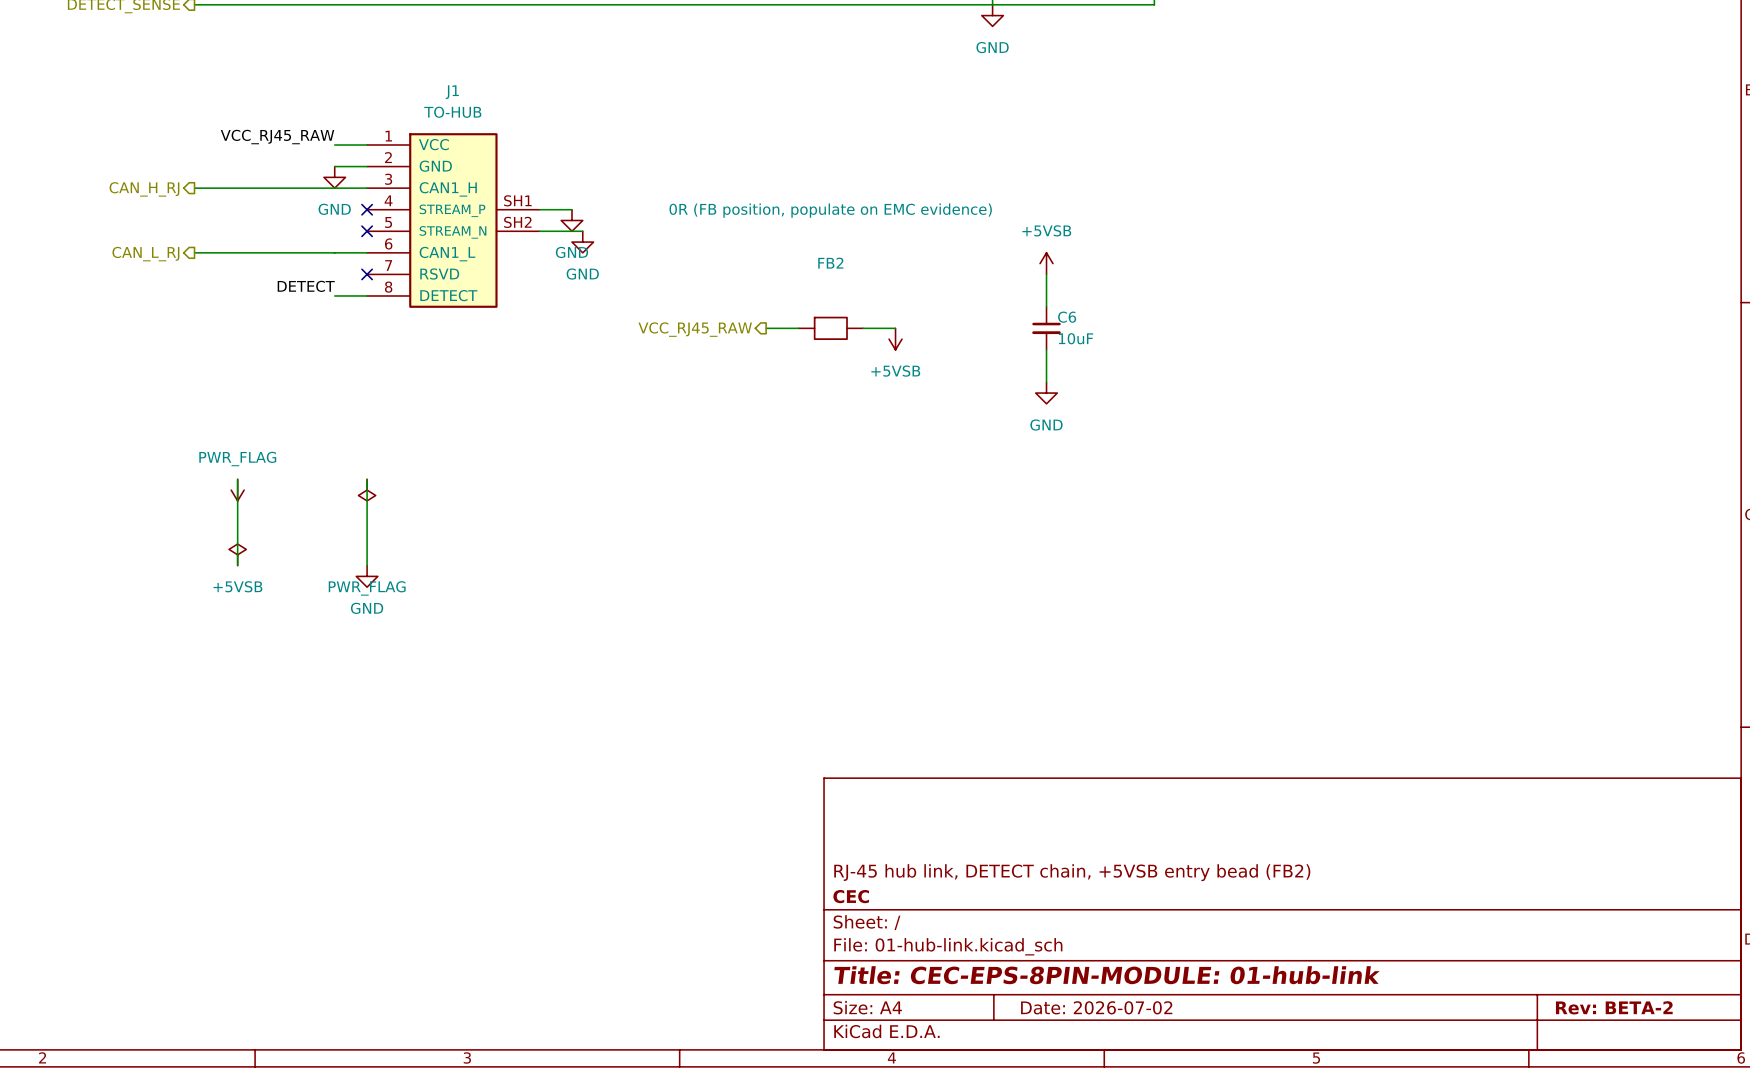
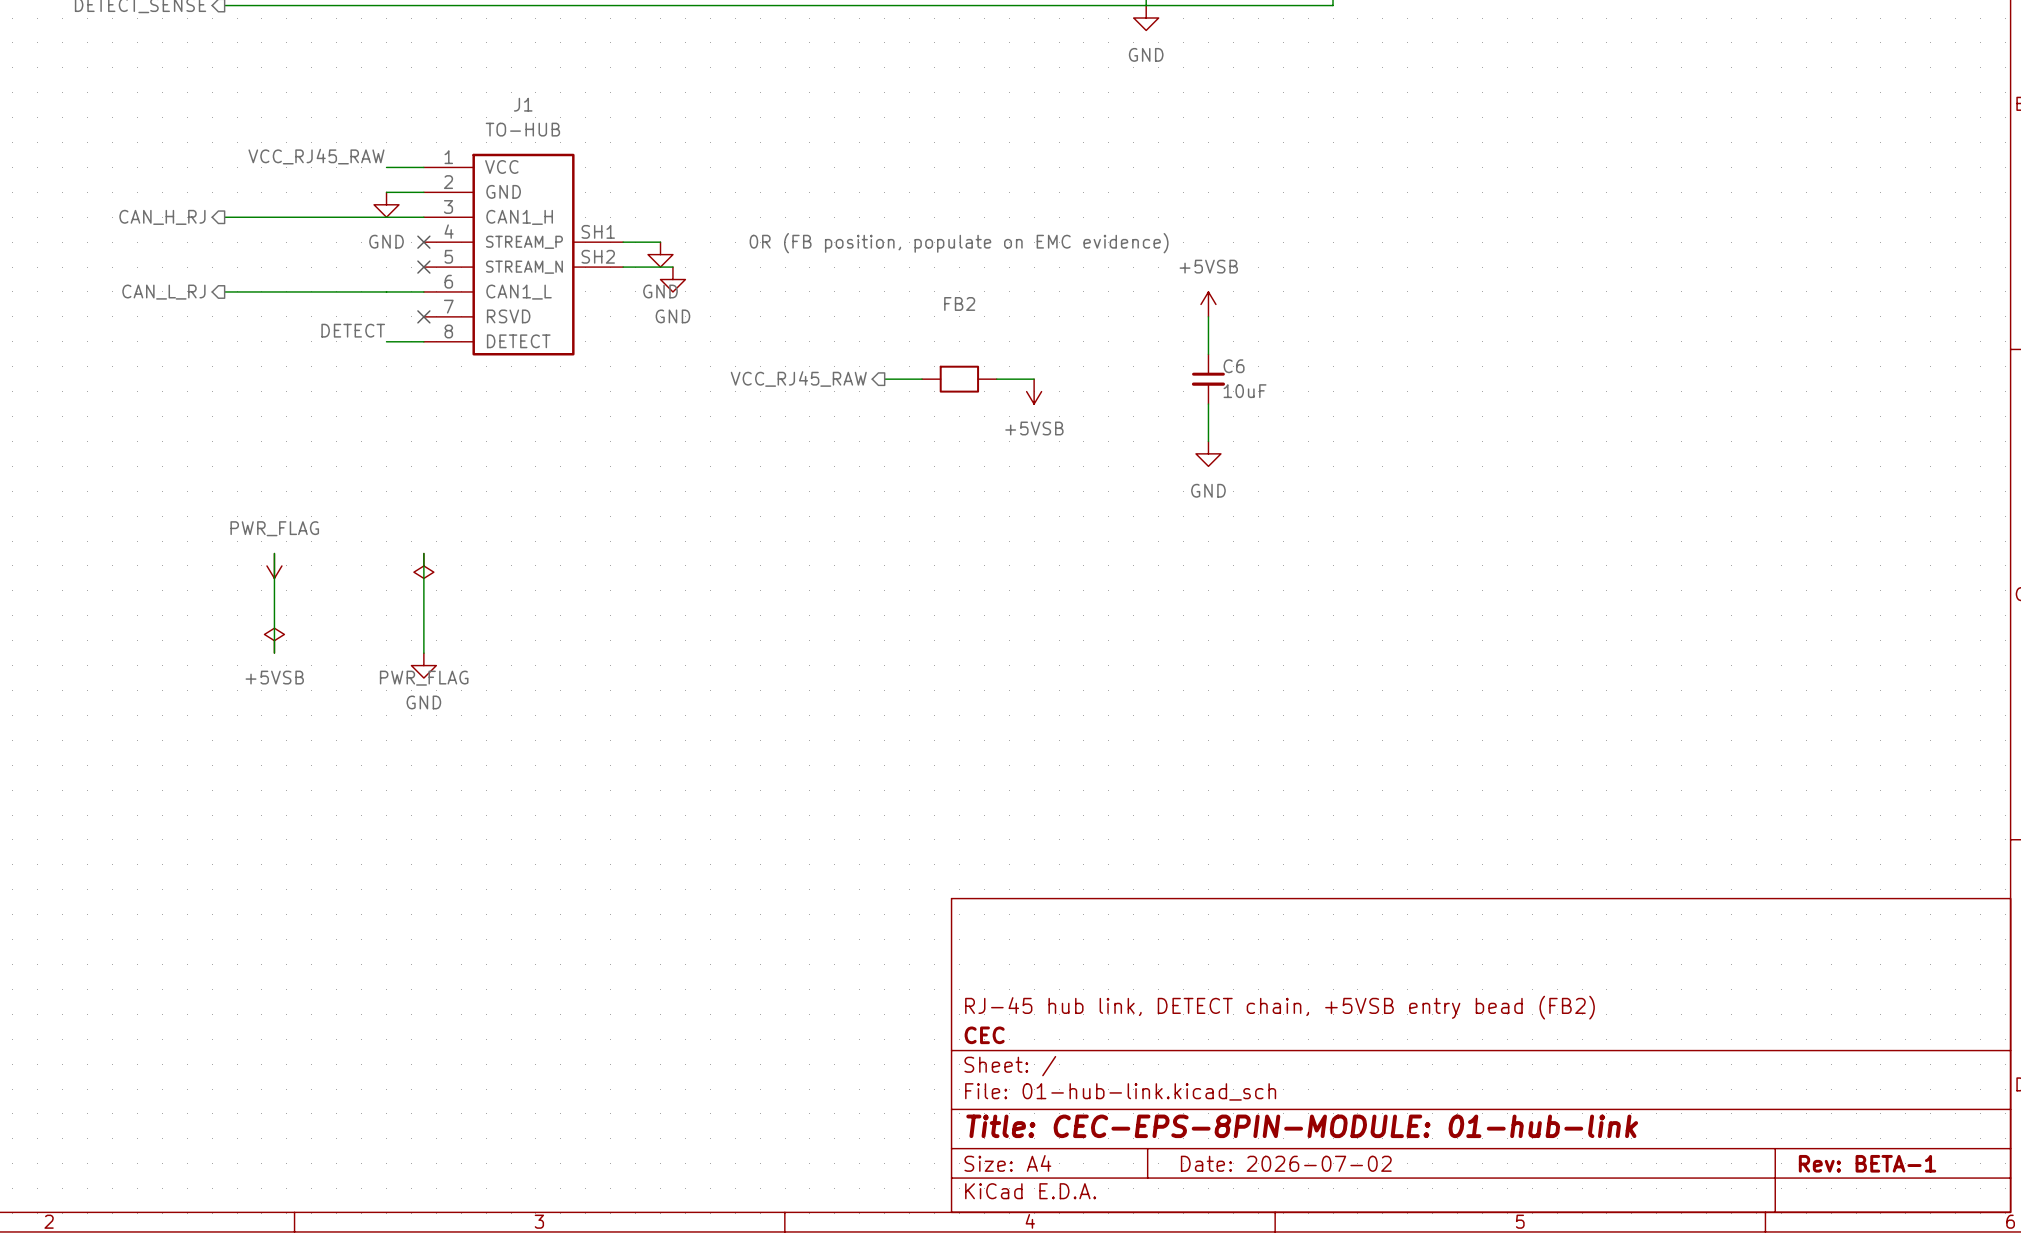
title block: Rev: BETA-2 (1614, 1007) -> Rev: BETA-1 (1867, 1163)

